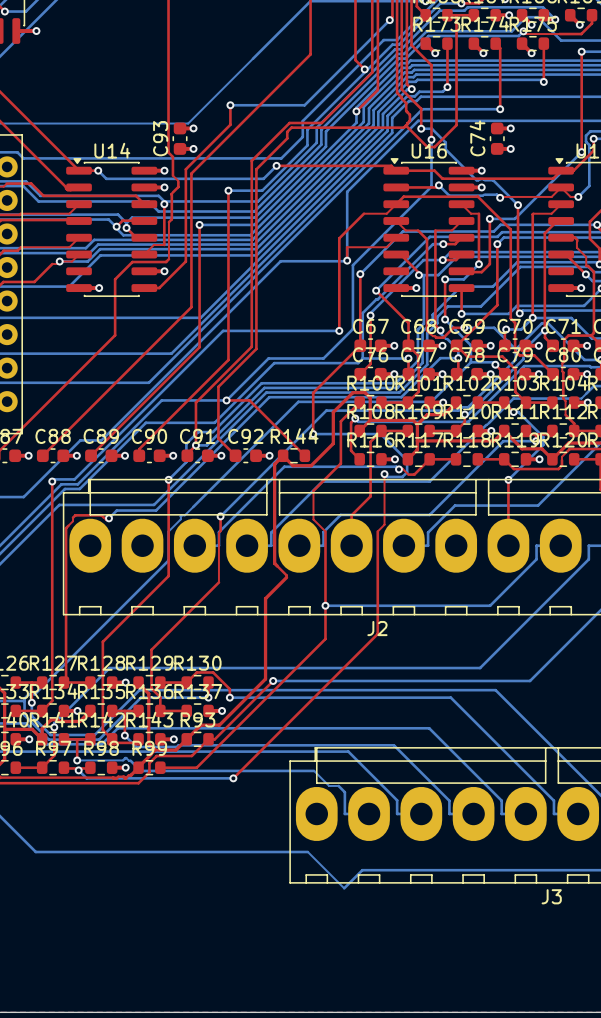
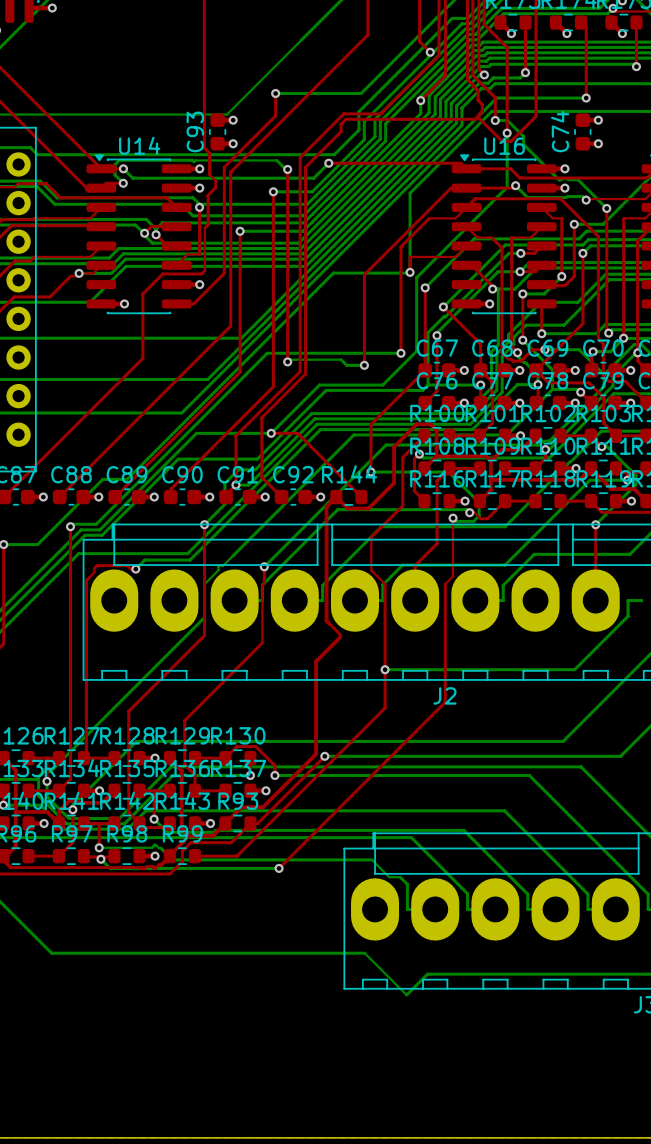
top track: none -> (287, 169) (287, 361)
bottom track: none -> (287, 169) (276, 160) (194, 161) (192, 160) (119, 160) (115, 164) (115, 175) (123, 183)
via: none -> (287, 169)
top track: none -> (123, 183) (106, 183) (101, 188)
via: none -> (123, 183)
top track: none -> (466, 188) (451, 188) (364, 274) (364, 365)
bottom track: none -> (287, 361) (289, 359) (341, 359) (346, 365) (364, 365)
via: none -> (287, 361)
via: none -> (364, 365)

